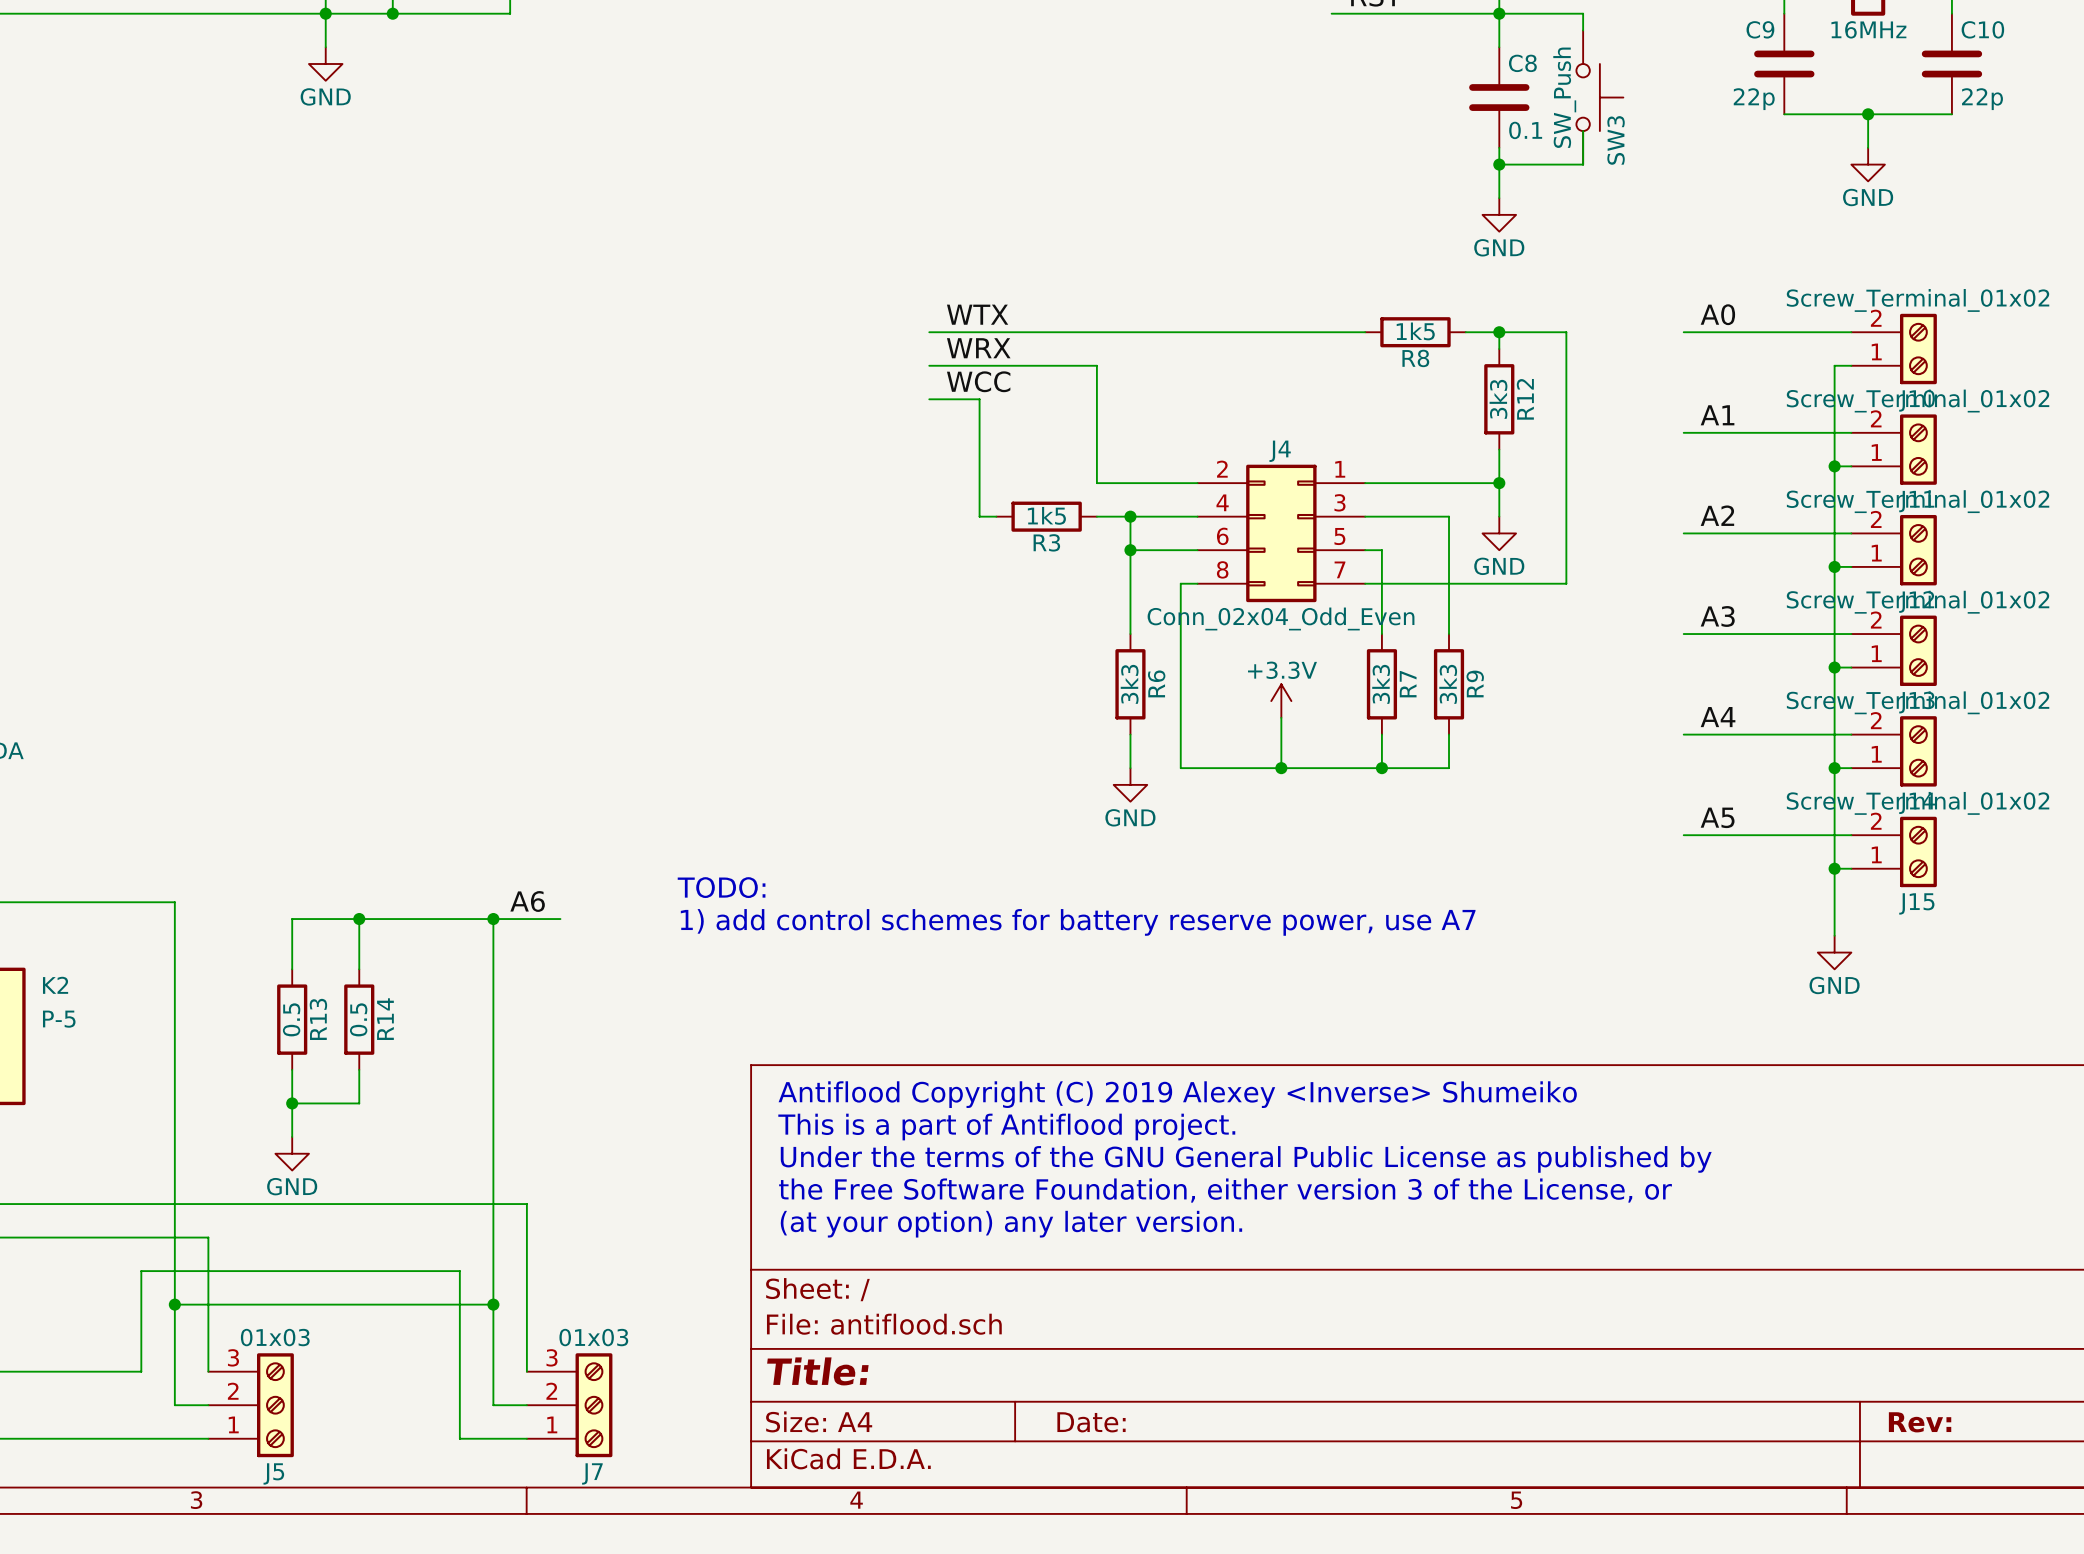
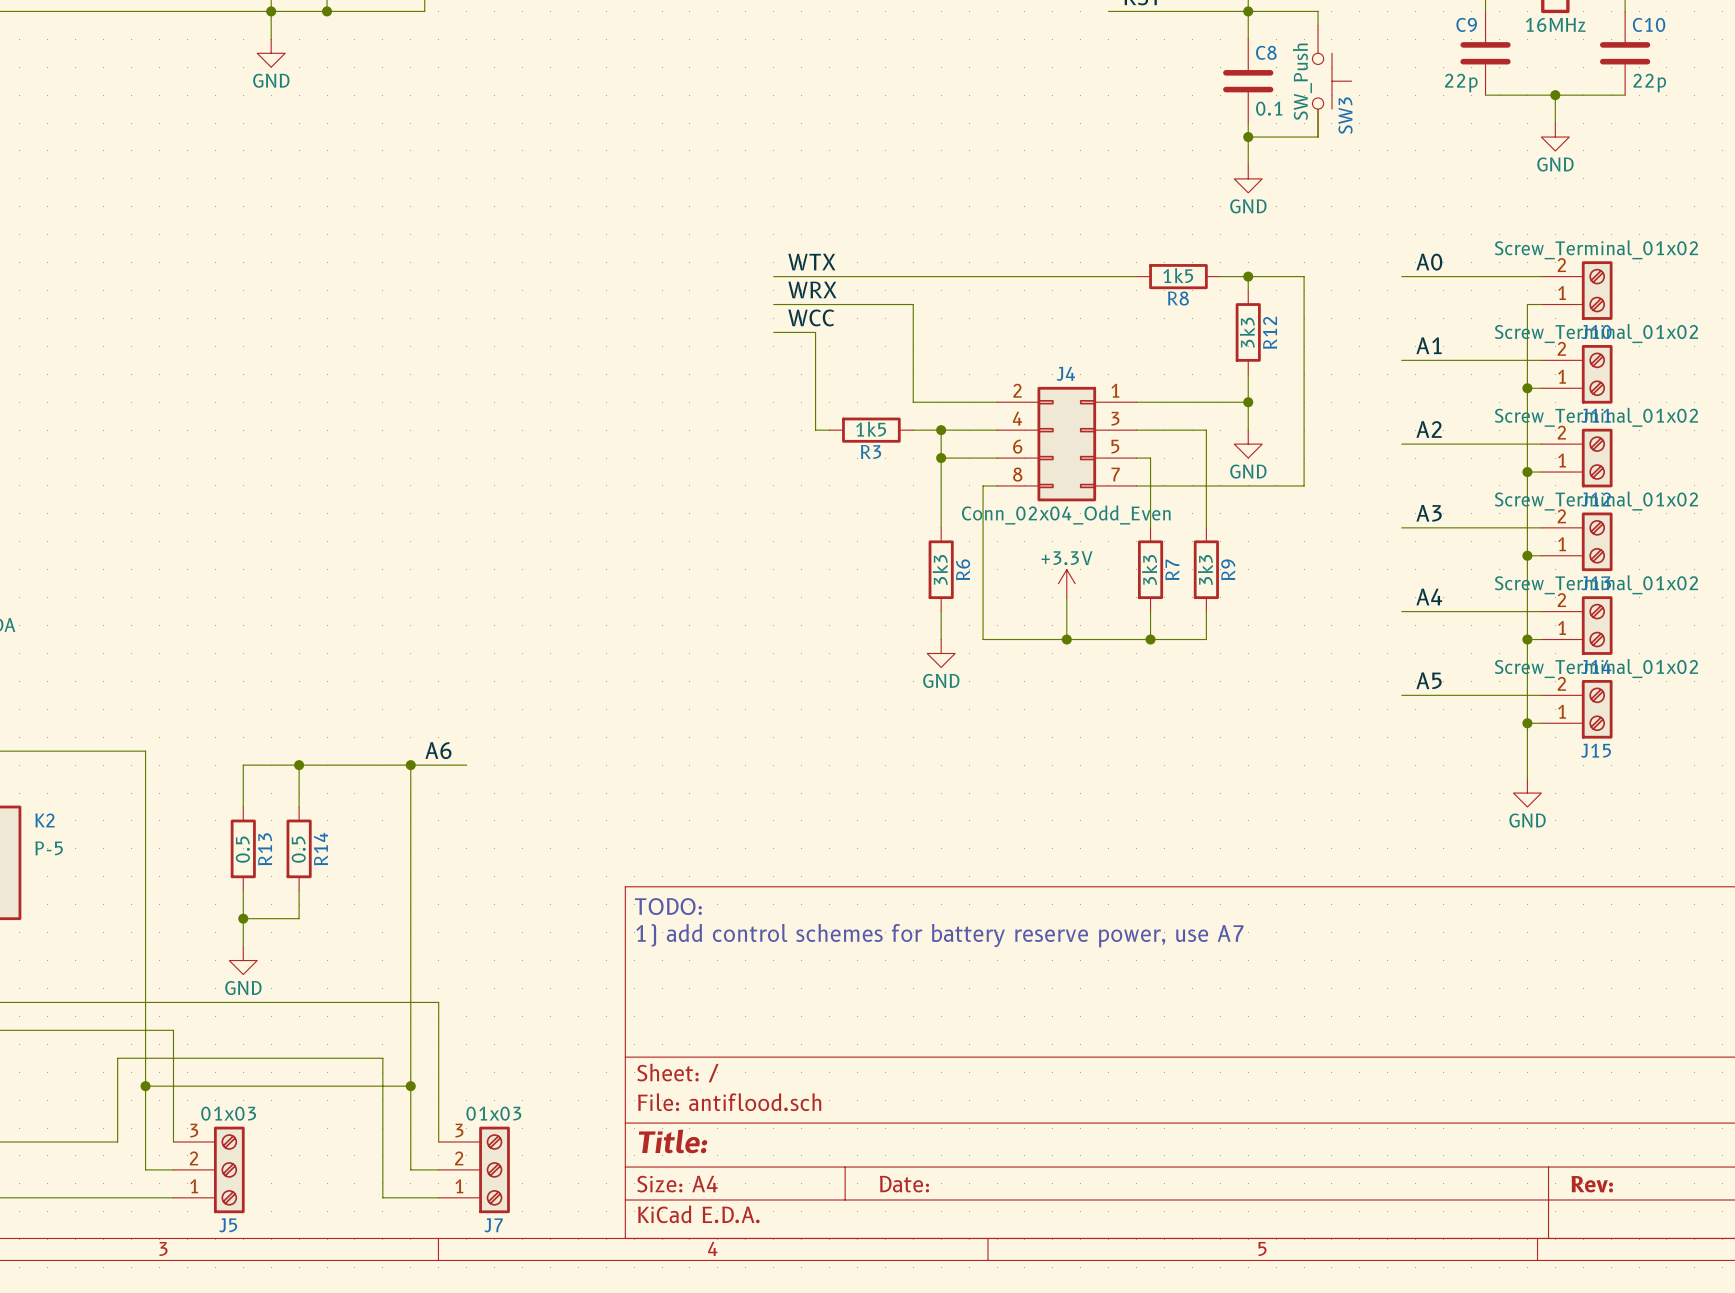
text position: TODO: (721, 887) -> TODO: (668, 906)
text position: 1) add control schemes for battery reserve power, use A7 (1078, 922) -> 1) add control schemes for battery reserve power, use A7 (939, 935)
text: Antiflood Copyright (C) 2019 Alexey <Inverse> Shumeiko (1177, 1094) -> none
text: This is a part of Antiflood project. (1006, 1127) -> none
text: Under the terms of the GNU General Public License as published by (1246, 1159) -> none
text: the Free Software Foundation, either version 3 of the License, or (1225, 1190) -> none
text: (at your option) any later version. (1011, 1224) -> none

